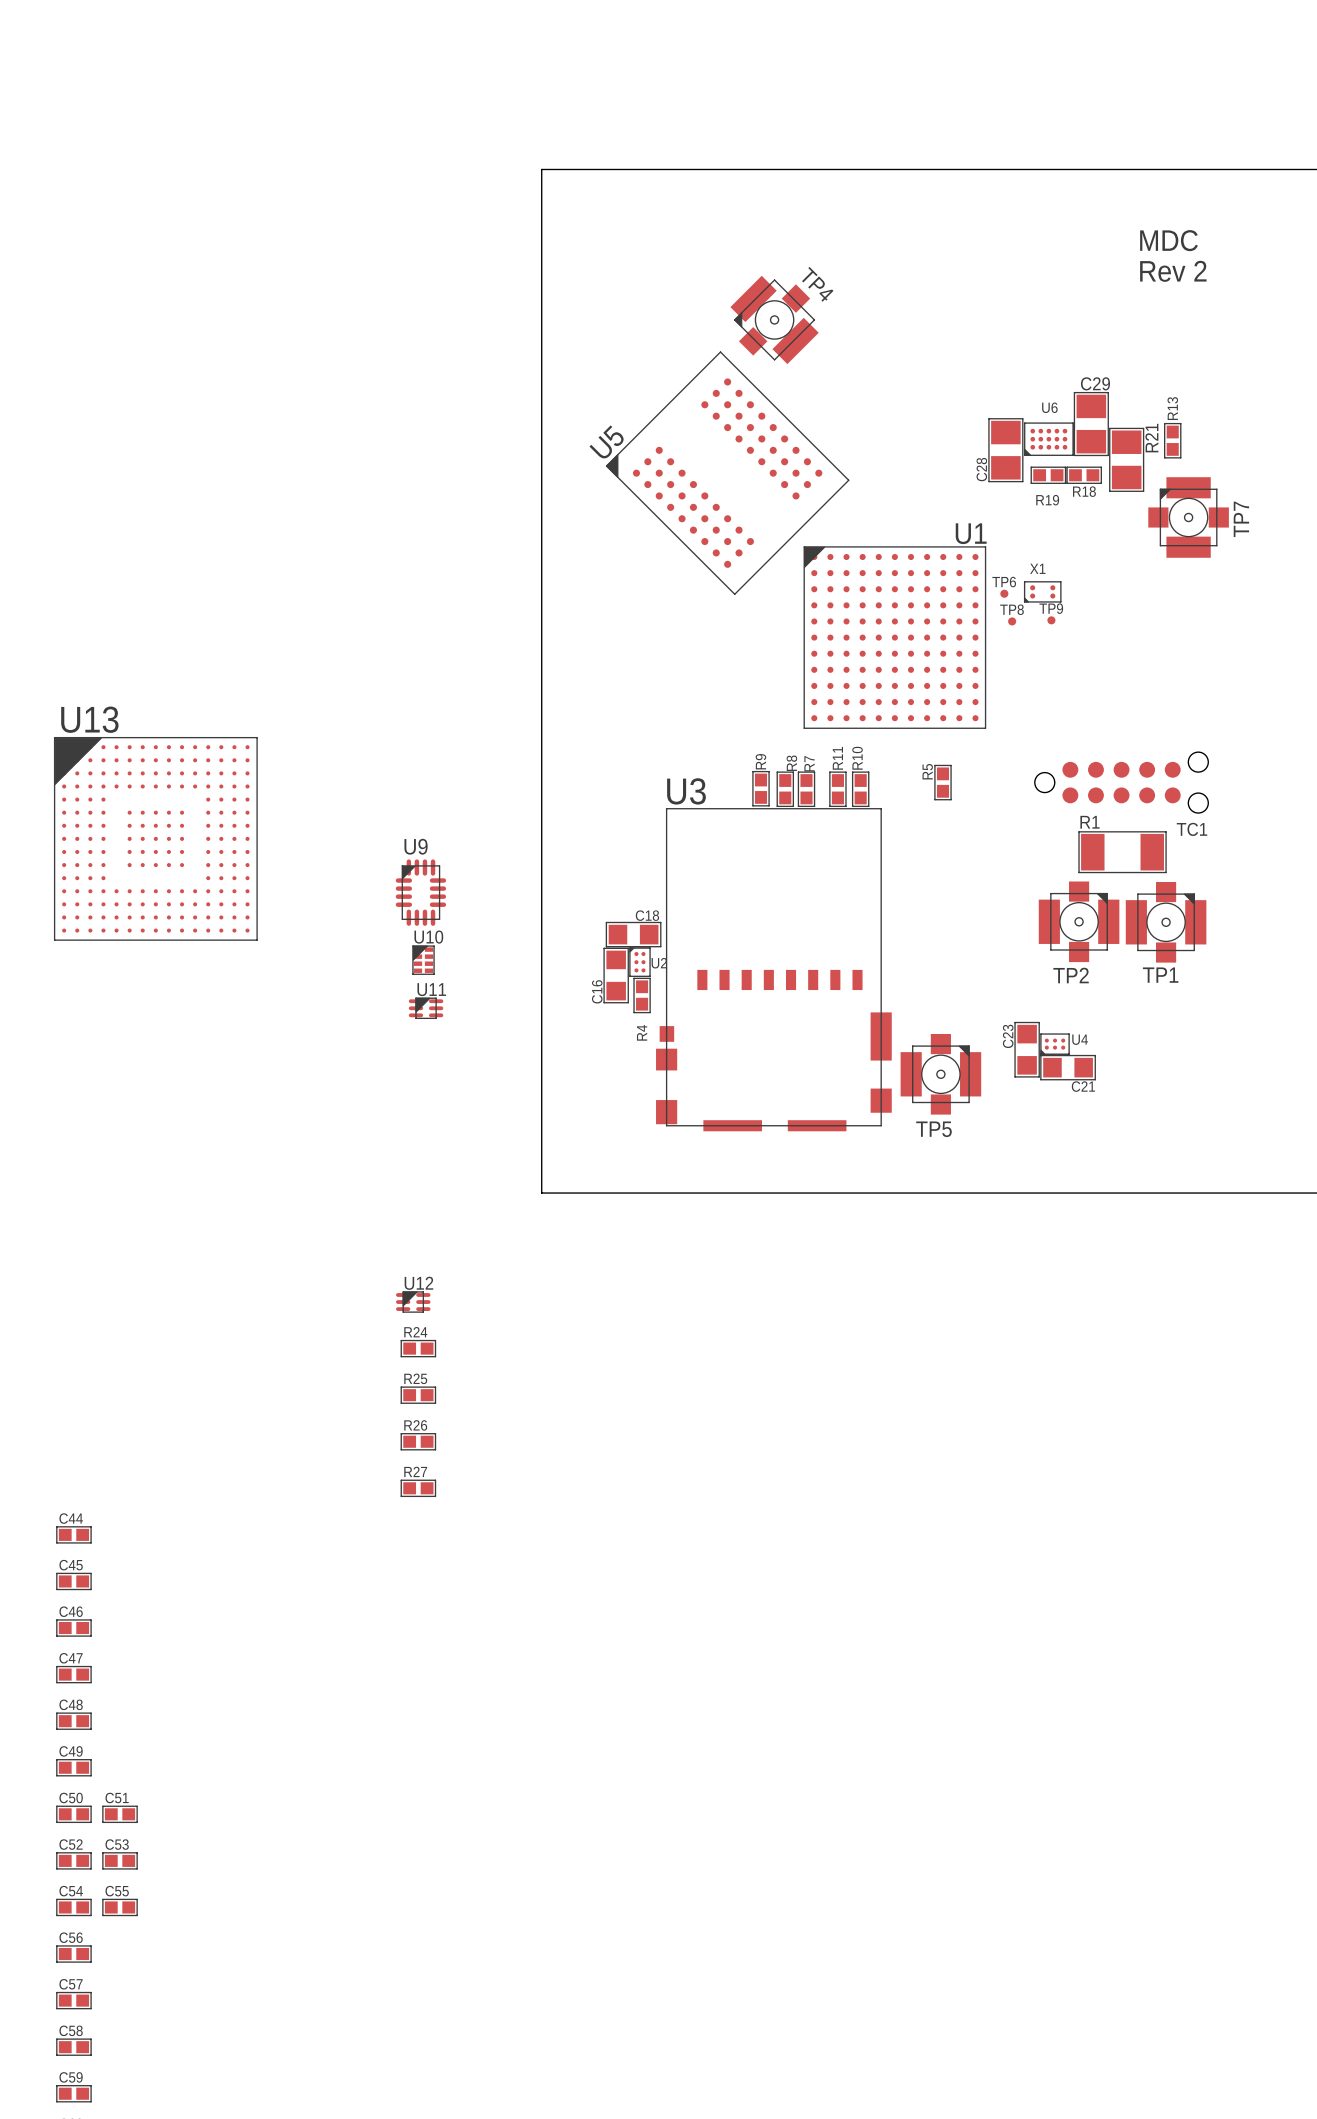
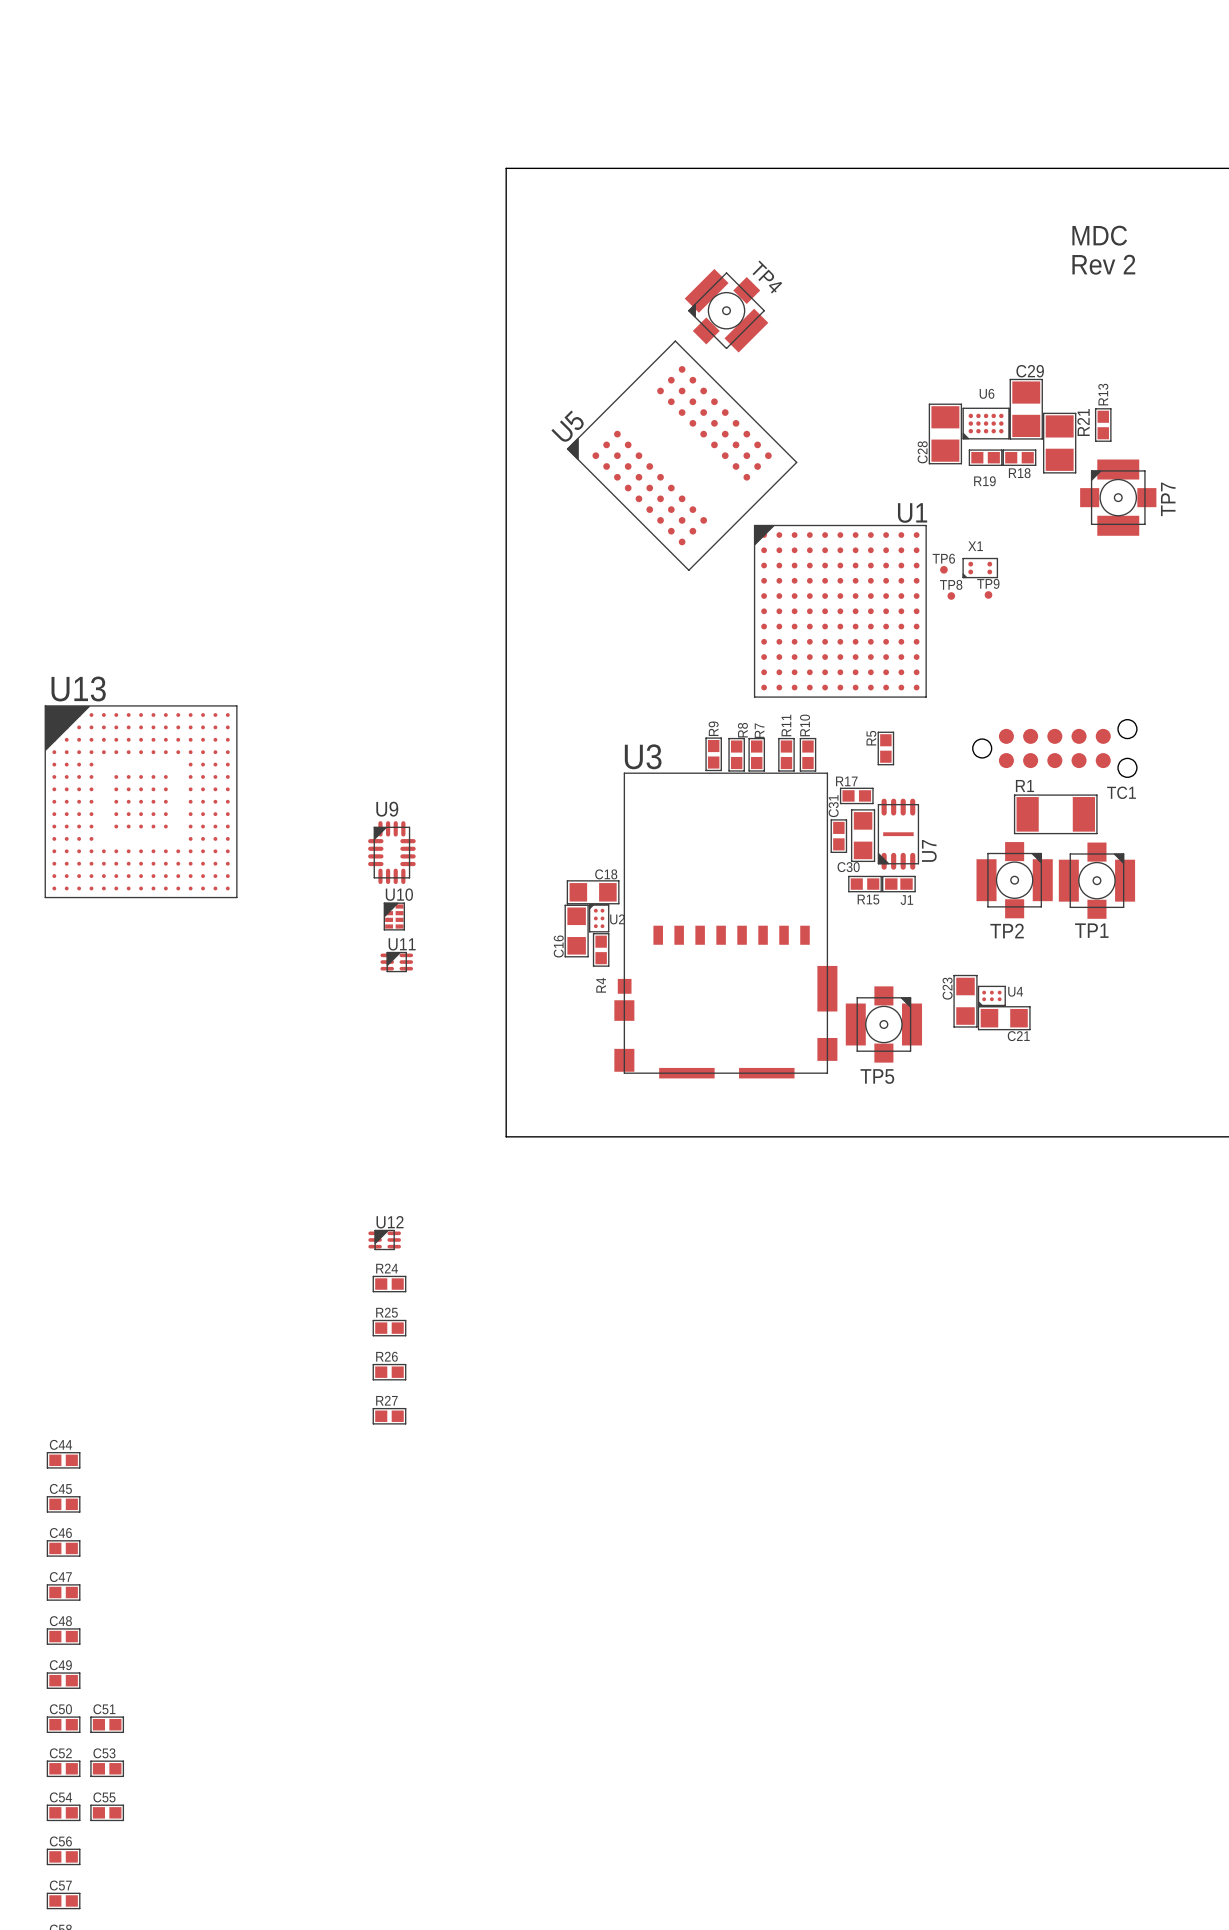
R17: none -> (856, 795)
U7: none -> (898, 834)
C30: none -> (863, 835)
C31: none -> (838, 836)
R15: none -> (865, 884)
J1: none -> (898, 884)

